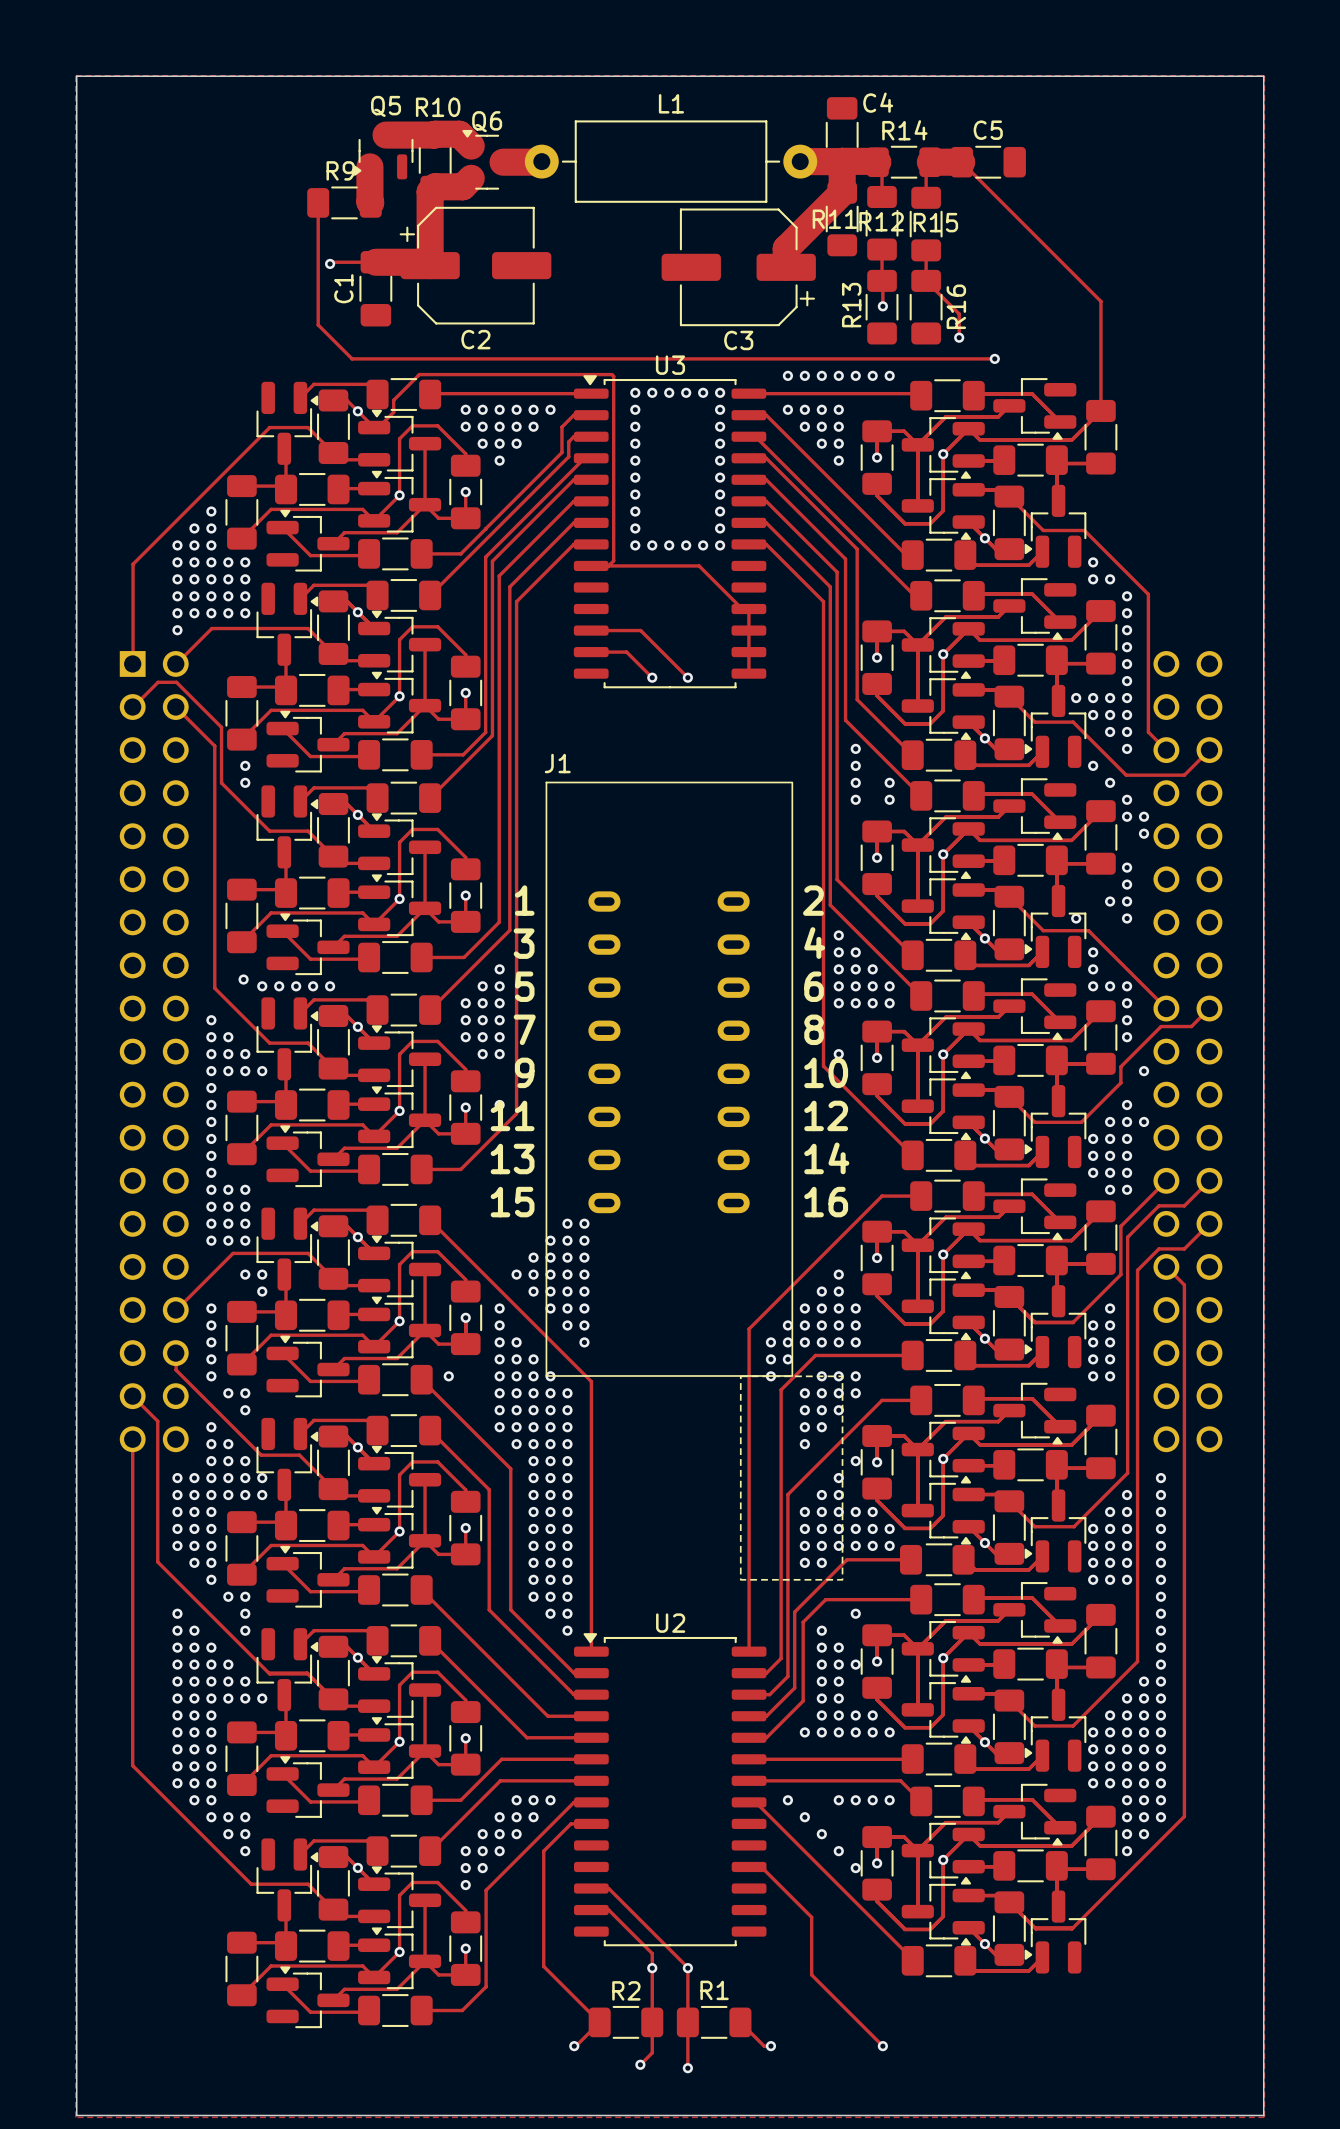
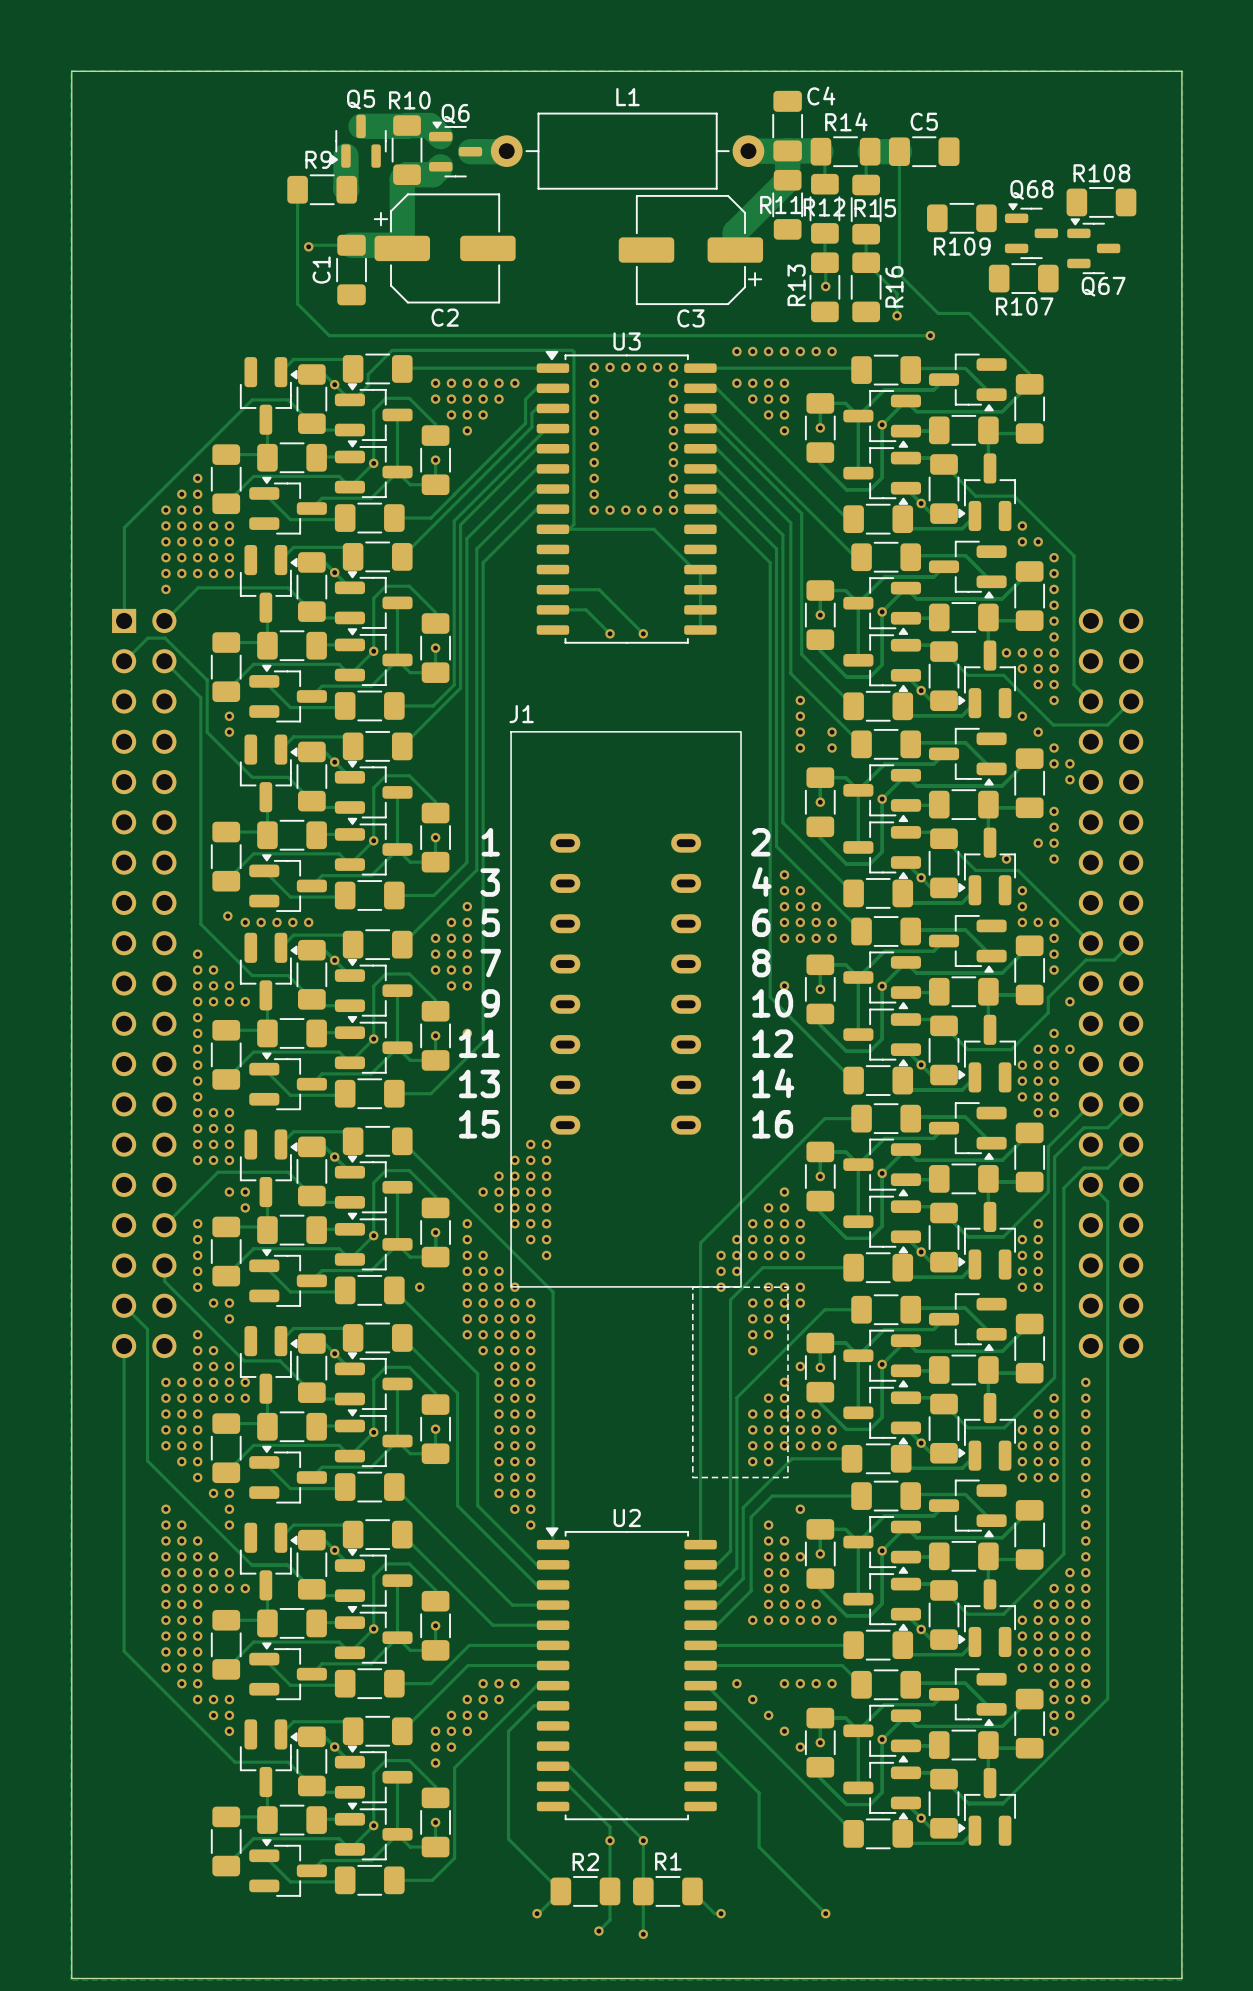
track: (961, 162) (1100, 301) (1100, 399) -> (899, 151) (899, 274) (938, 313) (969, 313) (1029, 374)
R108: none -> (1101, 202)
R109: none -> (961, 218)
Q68: none -> (1031, 231)
Q67: none -> (1093, 246)
R107: none -> (1023, 278)

